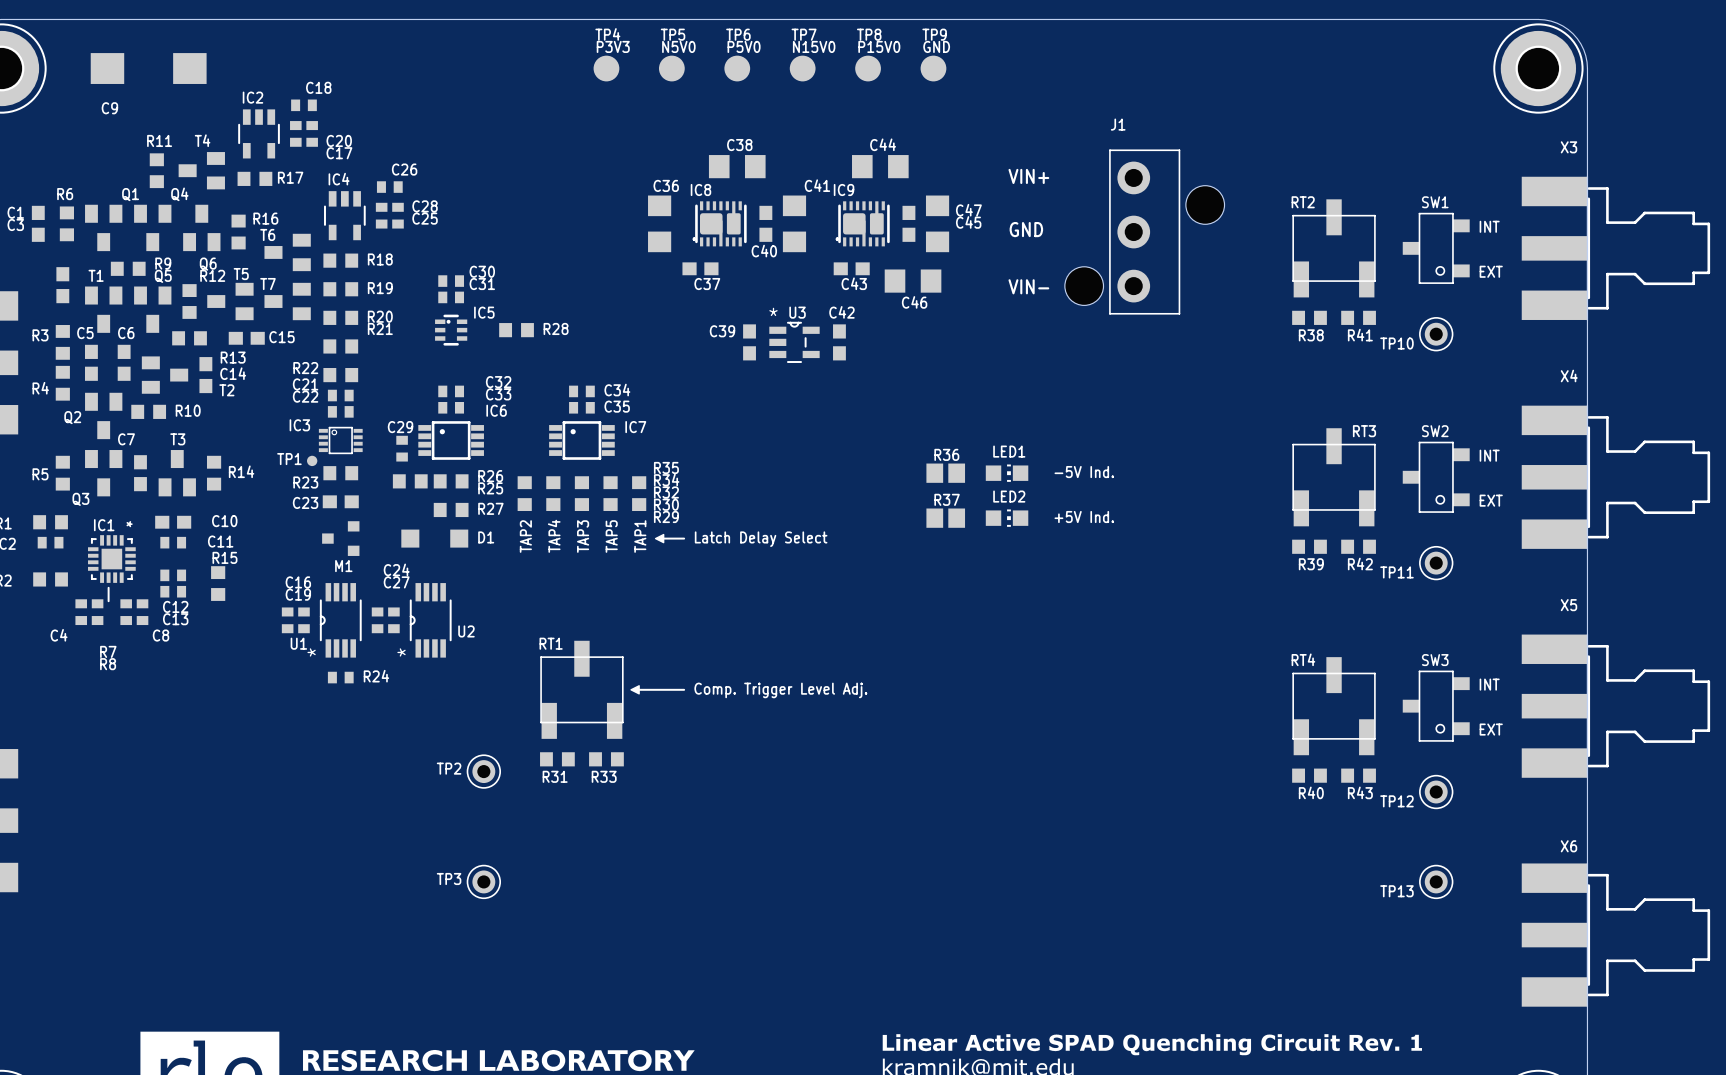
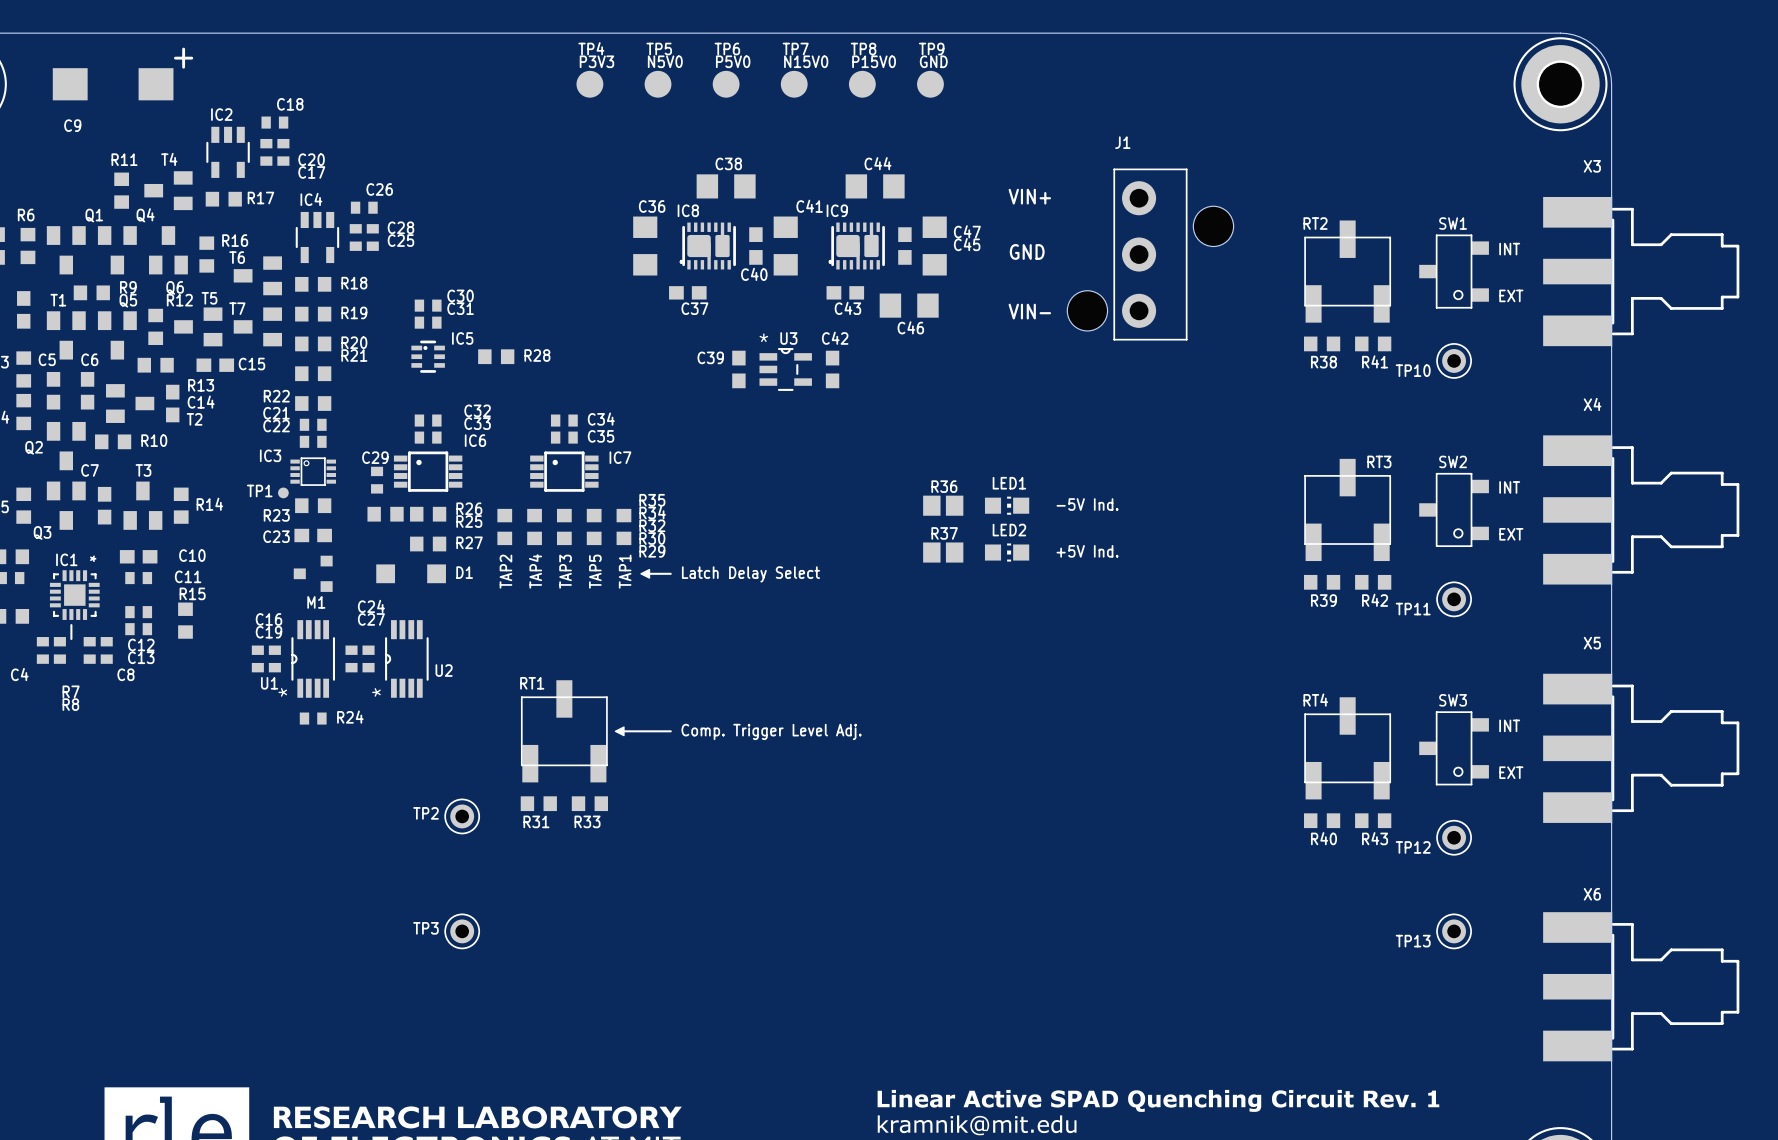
text: none -> + (183, 58)

